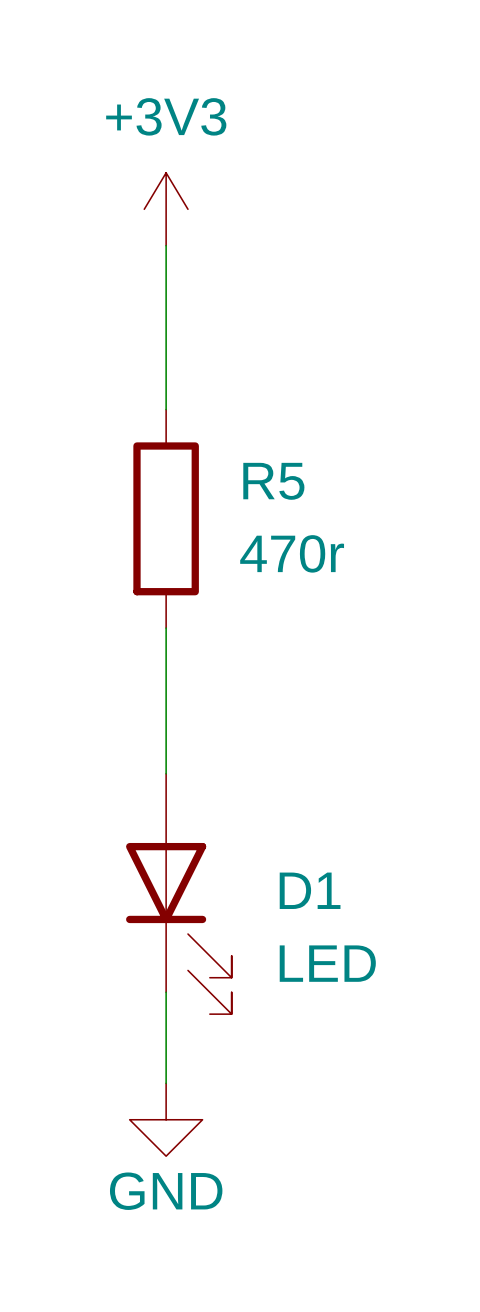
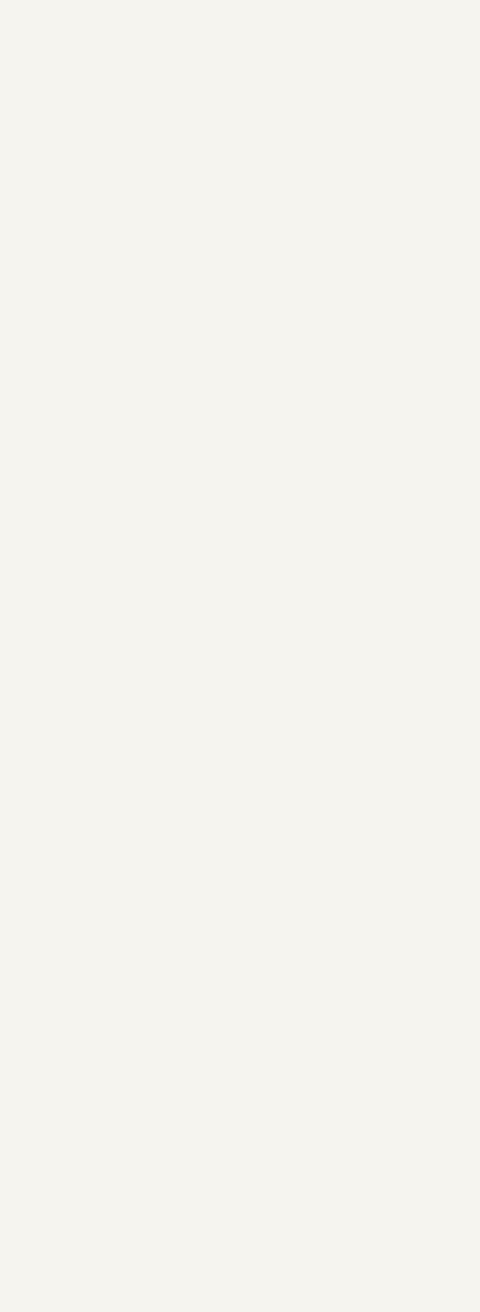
power symbol: +3V3 (166, 209) -> none
wire: (166, 245) (166, 409) -> none
R5: 470r (166, 518) -> none
wire: (166, 628) (166, 773) -> none
D1: LED (178, 893) -> none
wire: (166, 992) (166, 1083) -> none
power symbol: GND (166, 1119) -> none

